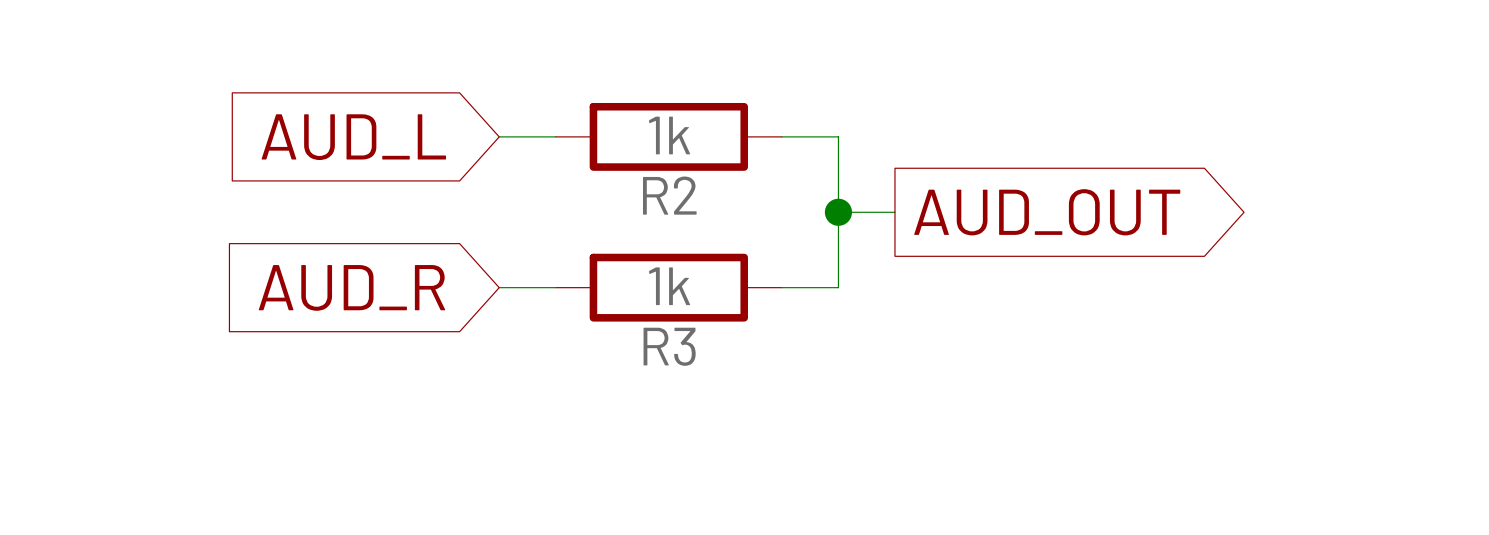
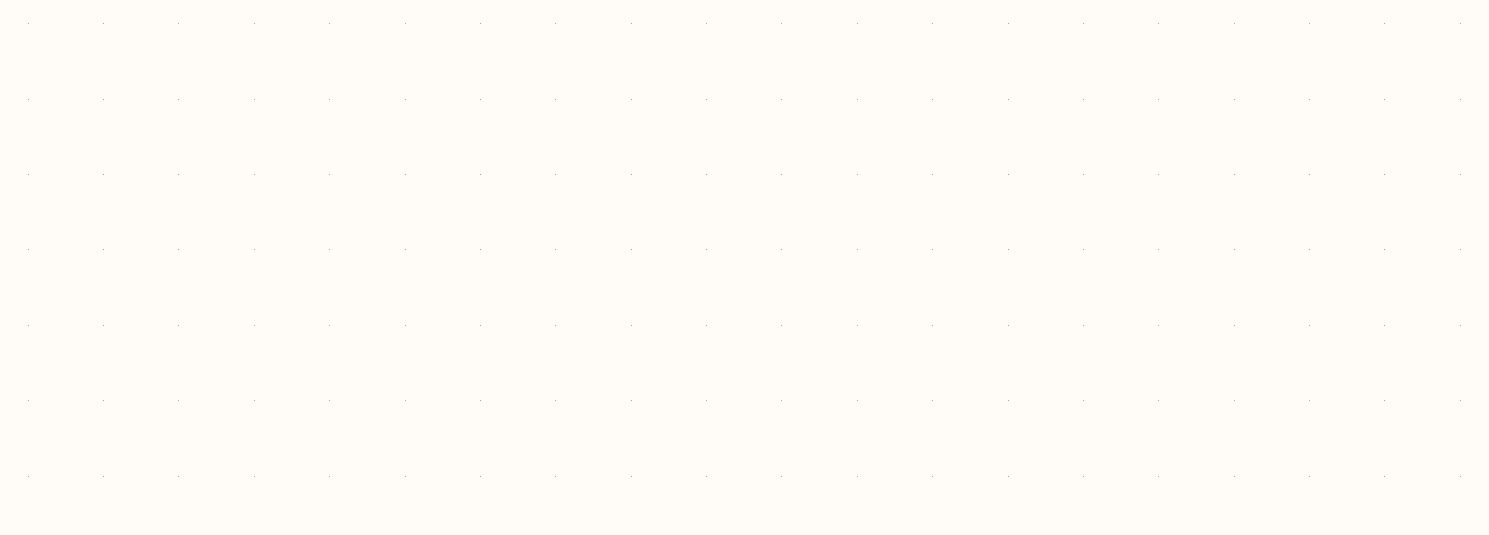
wire: (499, 136) (555, 136) -> none
R2: 1k (668, 136) -> none
wire: (781, 136) (838, 136) (838, 287) (781, 287) -> none
global label: AUD_L (353, 137) -> none
wire: (838, 212) (894, 212) -> none
junction: (838, 212) -> none
global label: AUD_OUT (1047, 212) -> none
global label: AUD_R (351, 287) -> none
wire: (499, 287) (555, 287) -> none
R3: 1k (668, 287) -> none

